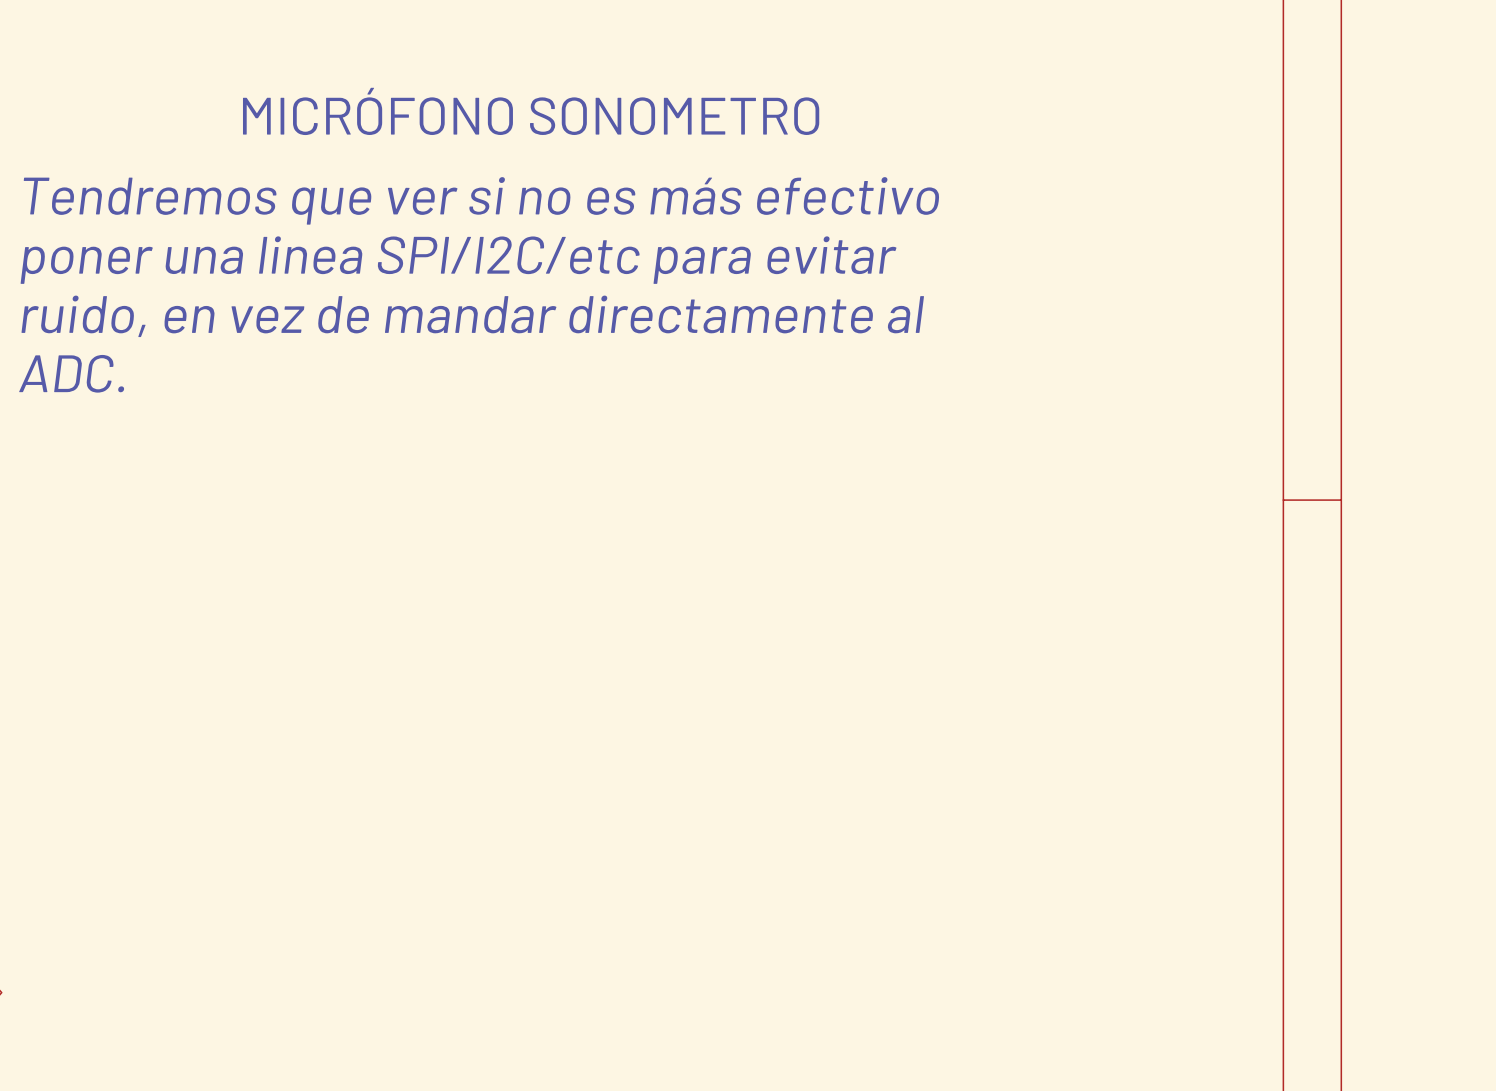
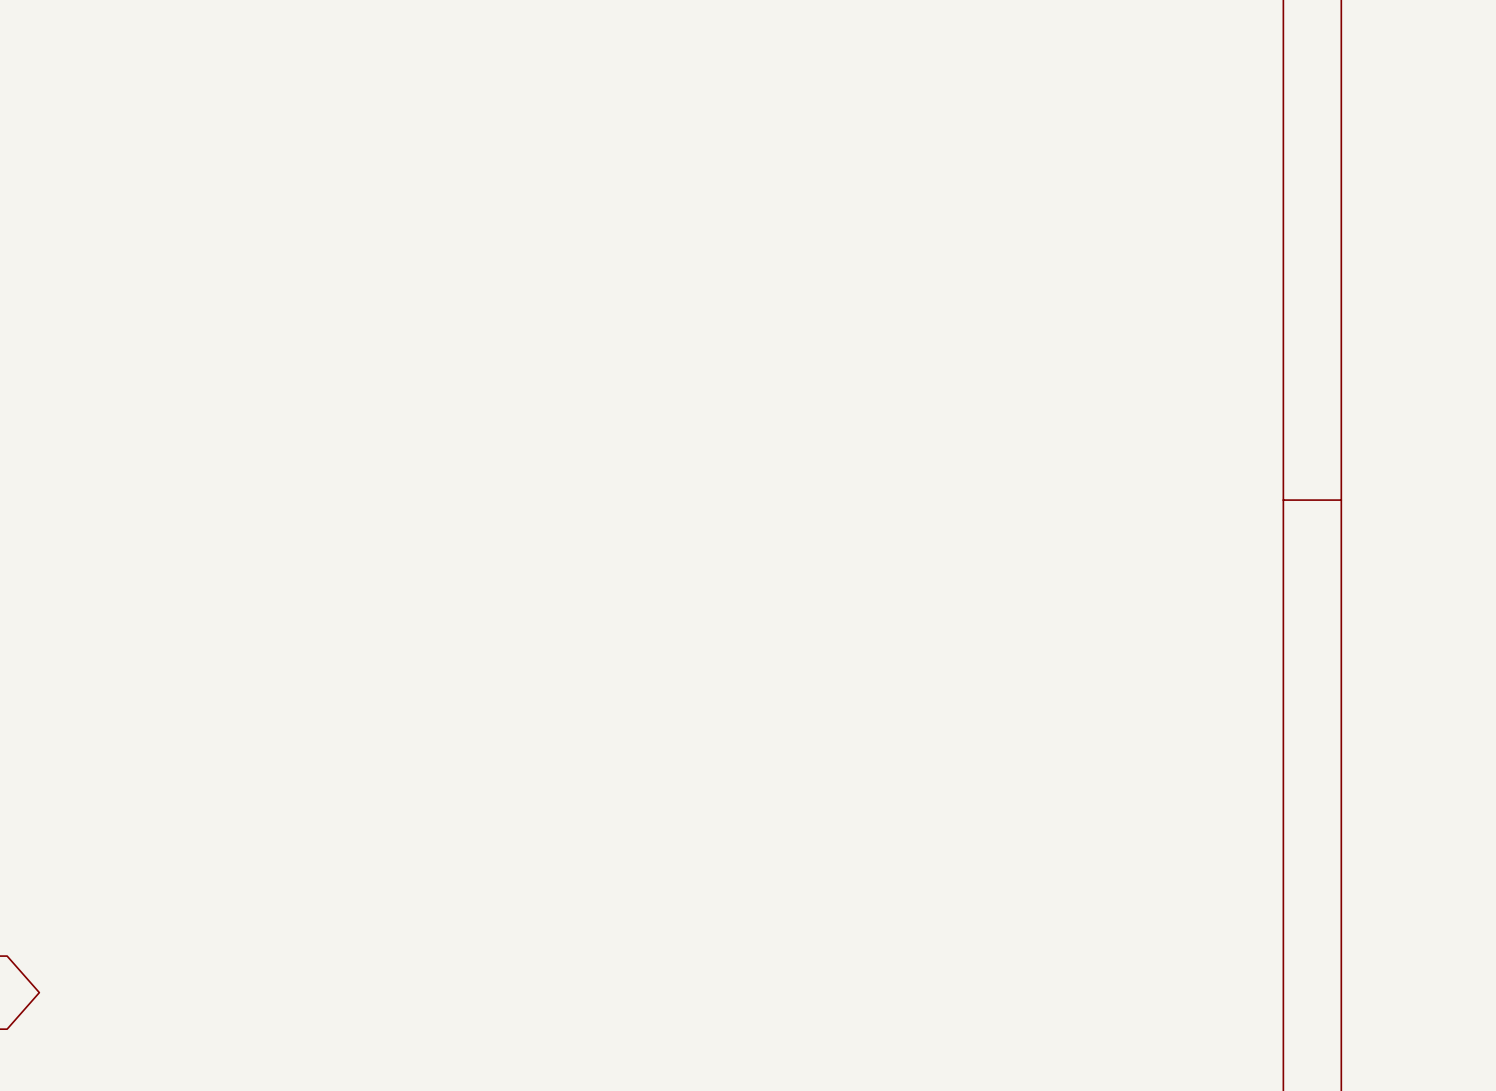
text: MICRÓFONO SONOMETRO (531, 111) -> none
text: Tendremos que ver si no es más efectivo (481, 200) -> none
text: poner una linea SPI/I2C/etc para evitar (458, 260) -> none
text: ruido, en vez de mandar directamente al (472, 316) -> none
text: ADC. (71, 373) -> none

